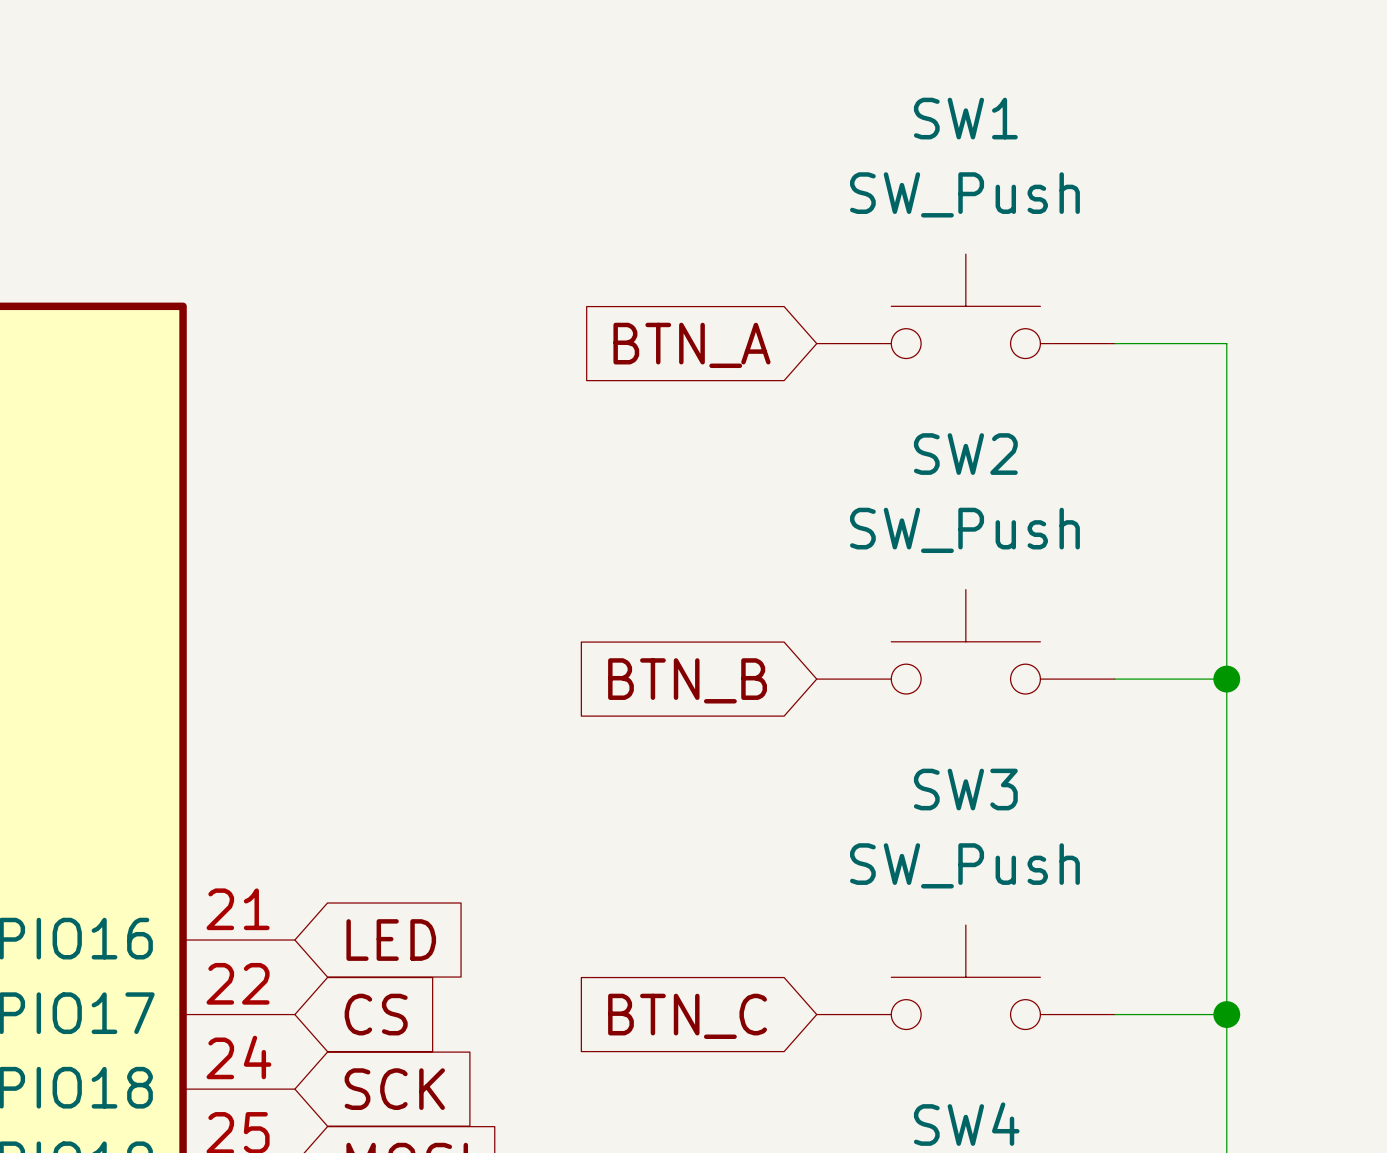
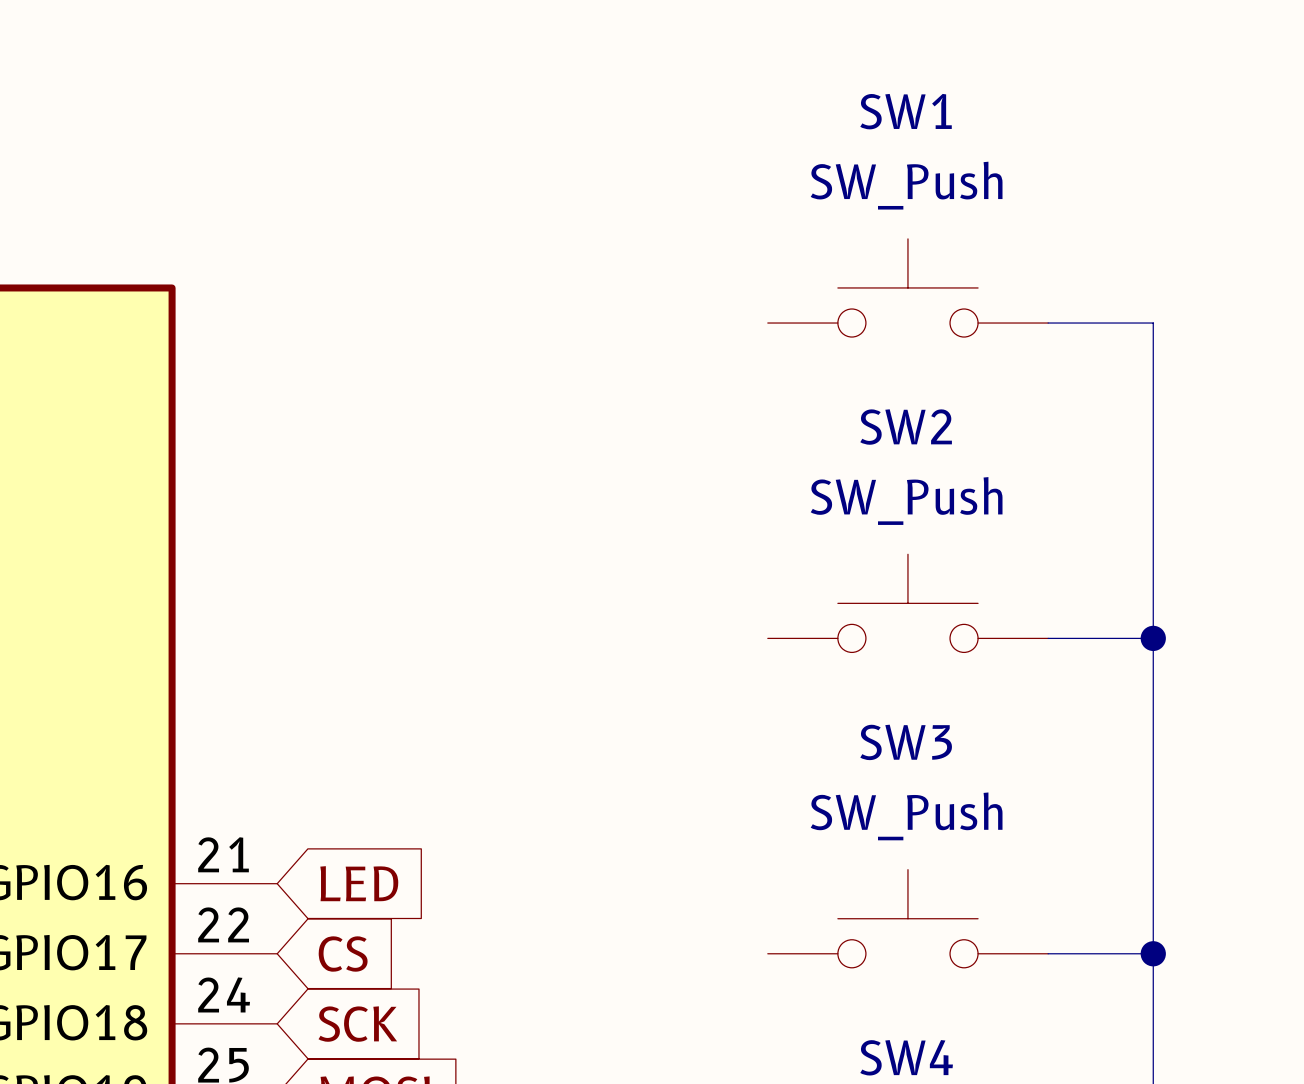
global label: BTN_A (691, 345) -> none
global label: BTN_B (687, 680) -> none
global label: BTN_C (687, 1016) -> none

